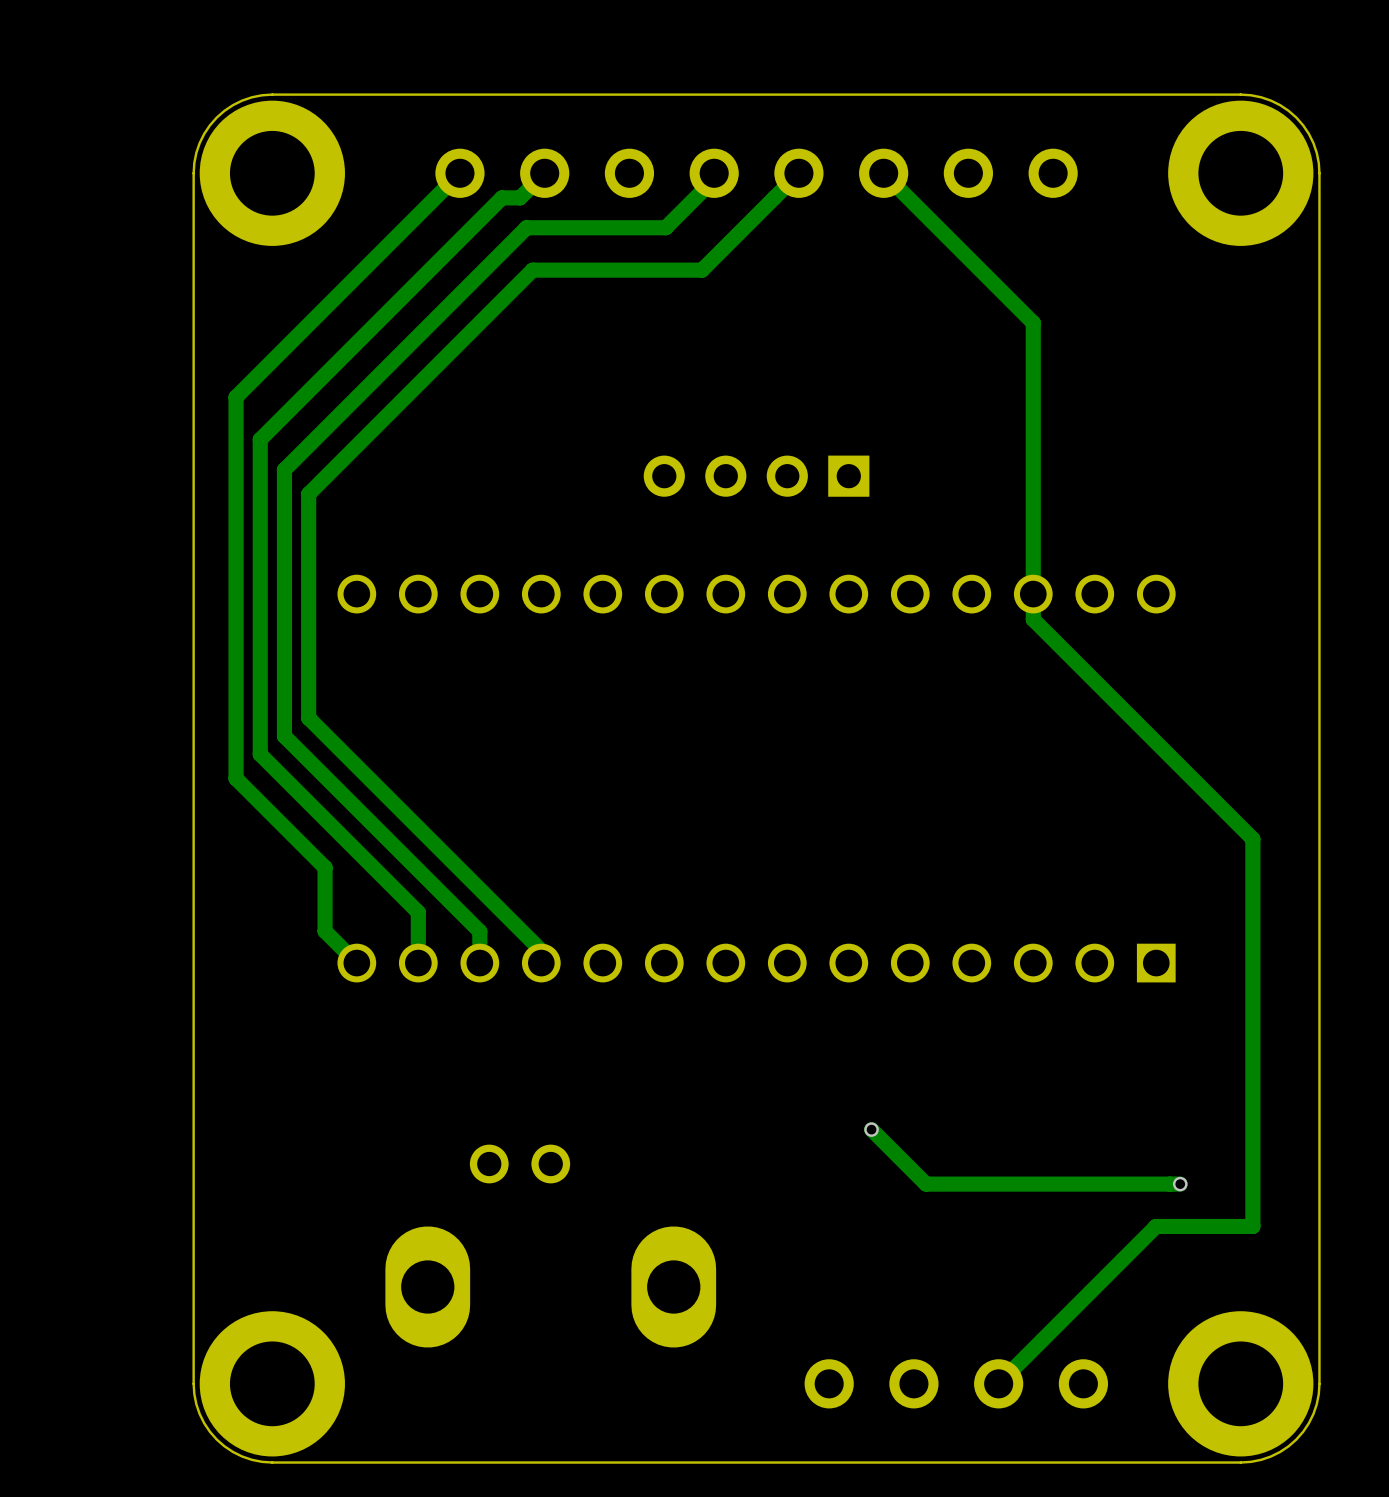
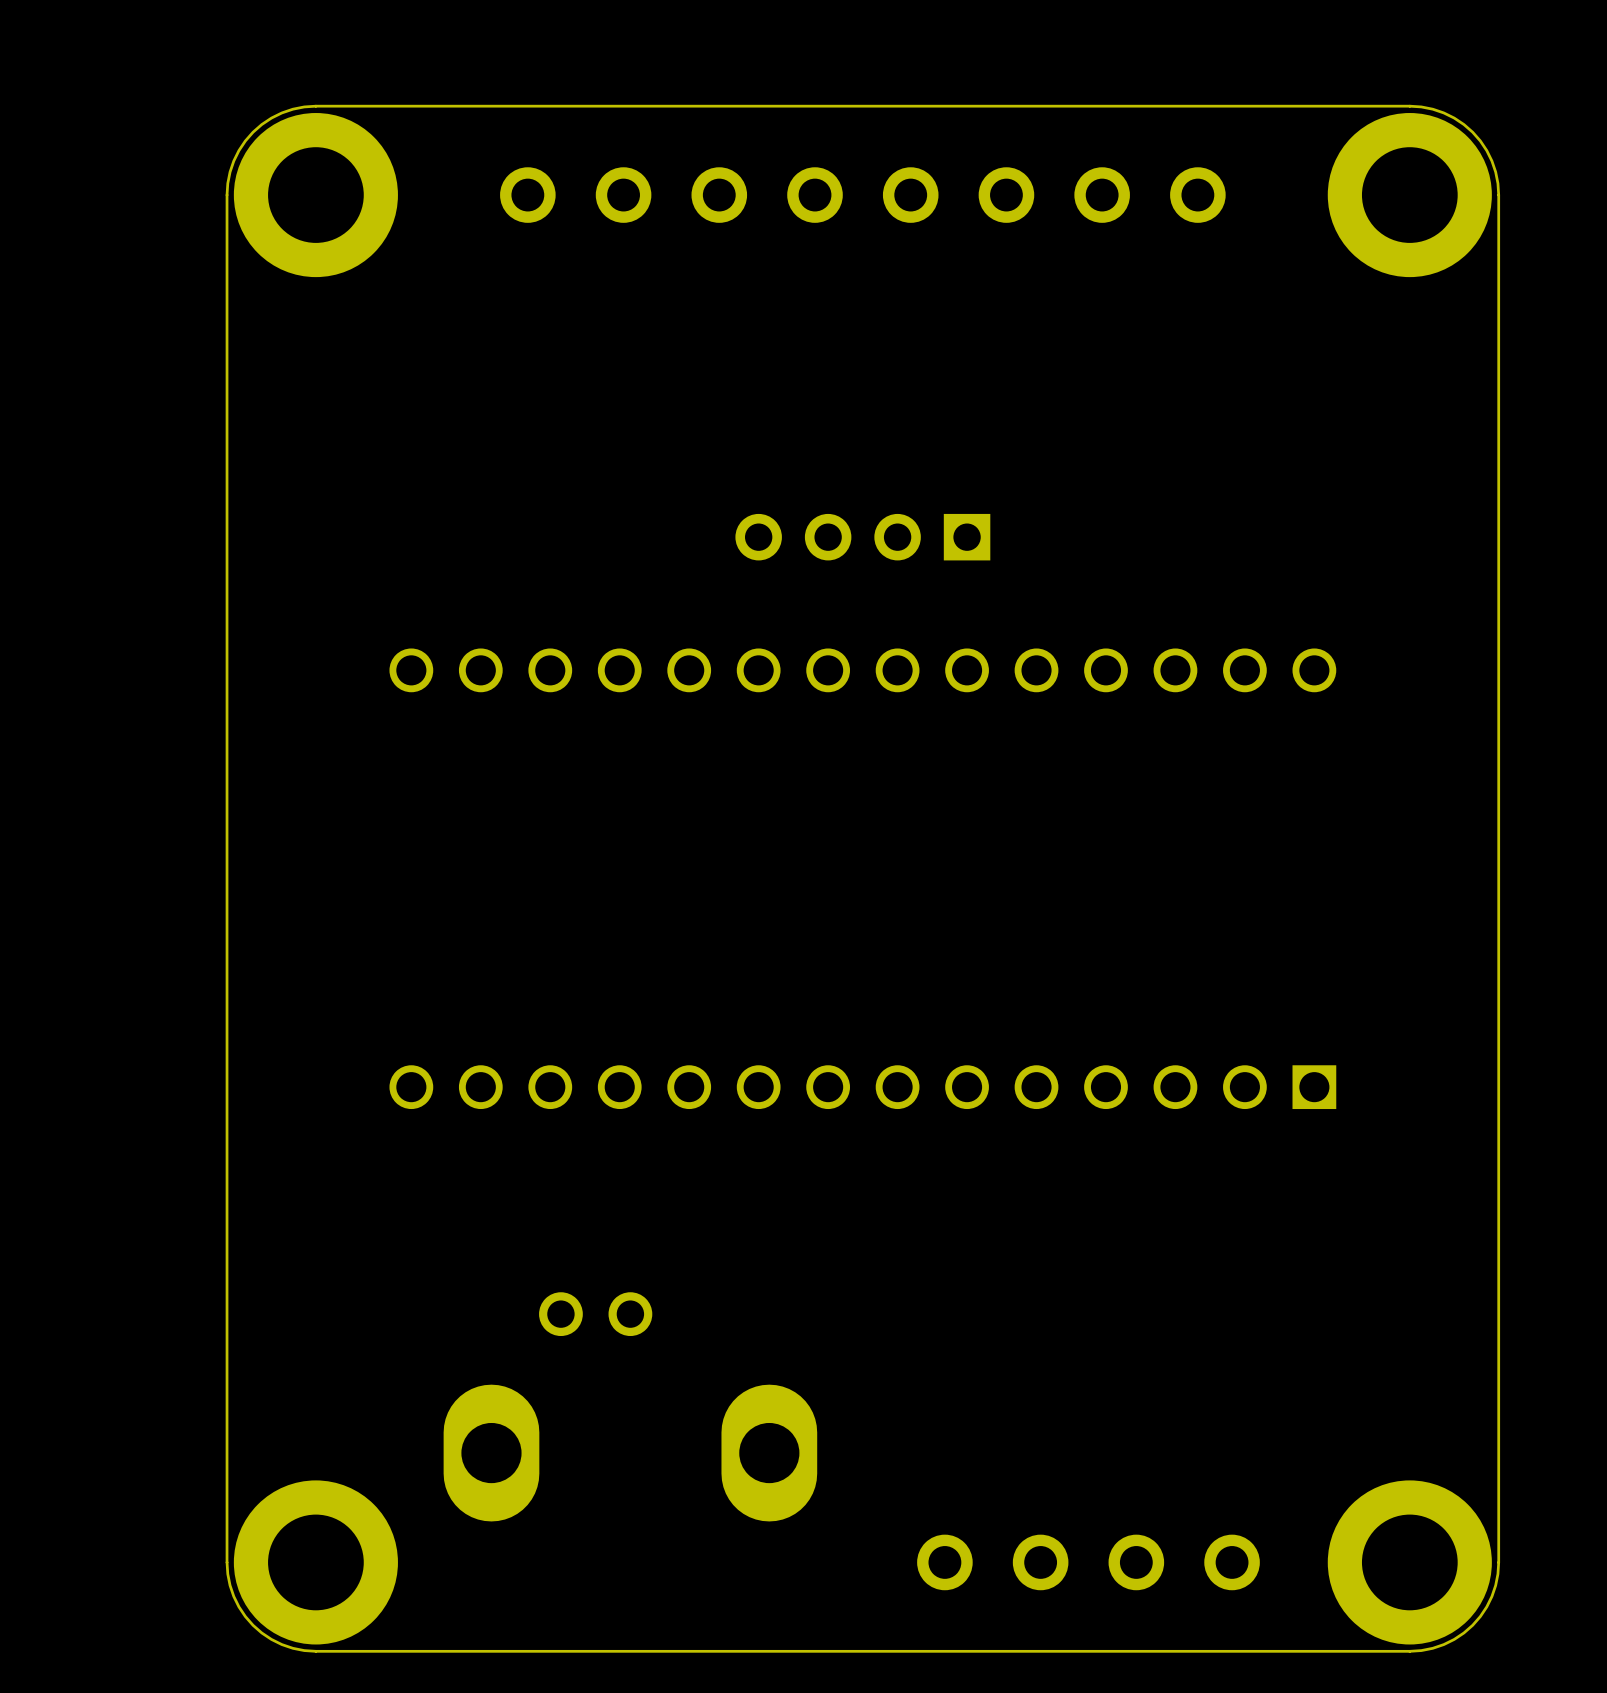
track: (459, 173) (236, 397) (236, 778) (325, 867) (325, 931) (356, 963) -> none
track: (544, 173) (520, 197) (501, 197) (260, 439) (260, 754) (418, 912) (418, 963) -> none
track: (714, 173) (714, 179) (665, 227) (526, 227) (284, 469) (284, 736) (479, 931) (479, 963) -> none
track: (798, 173) (702, 270) (532, 270) (308, 494) (308, 718) (541, 950) (541, 963) -> none
track: (883, 173) (1033, 322) (1033, 619) (1252, 839) (1252, 1226) (1156, 1226) (998, 1383) -> none
track: (871, 1129) (926, 1184) (1180, 1184) -> none
via: (871, 1129) -> none
via: (1180, 1184) -> none

